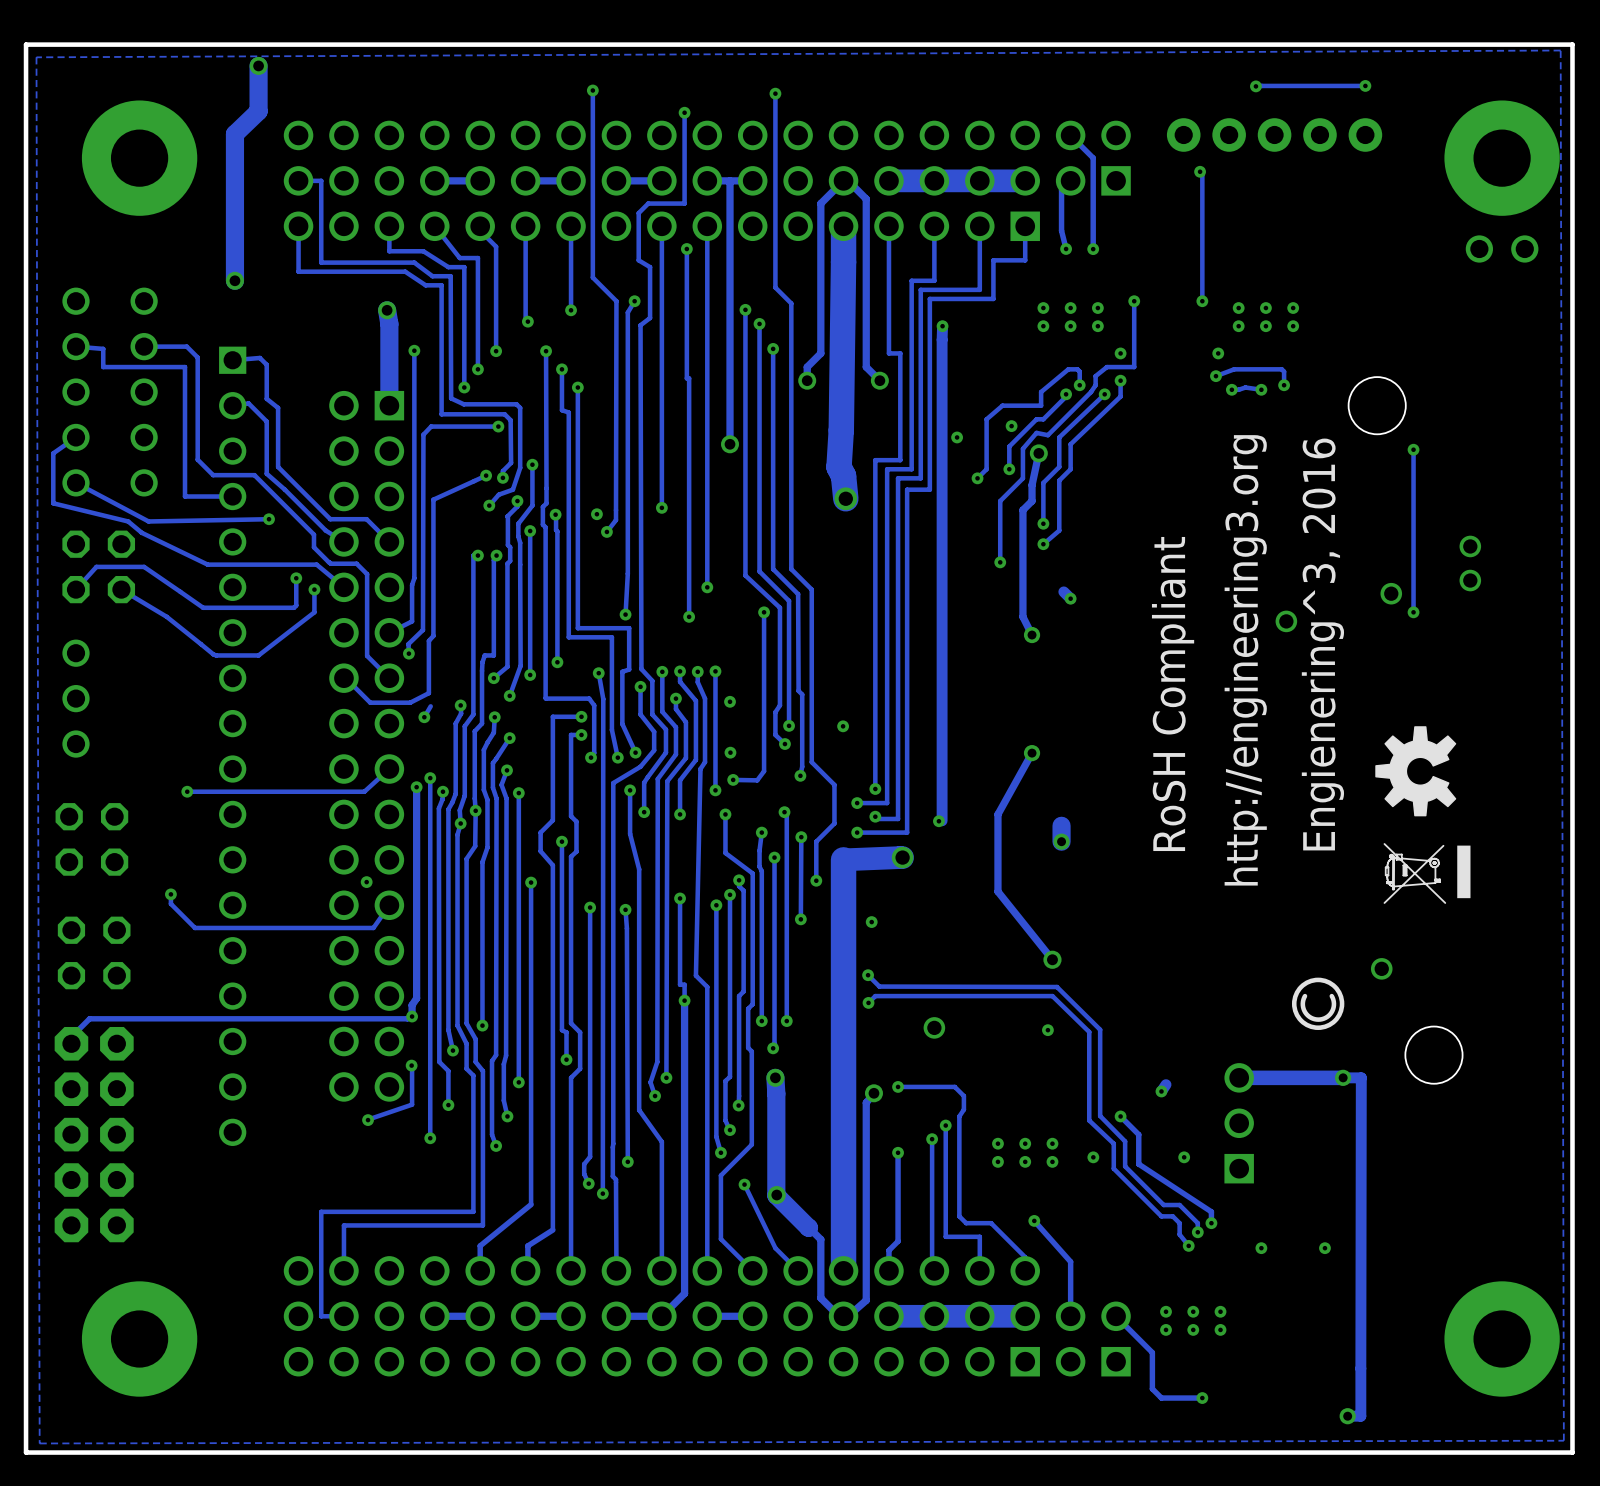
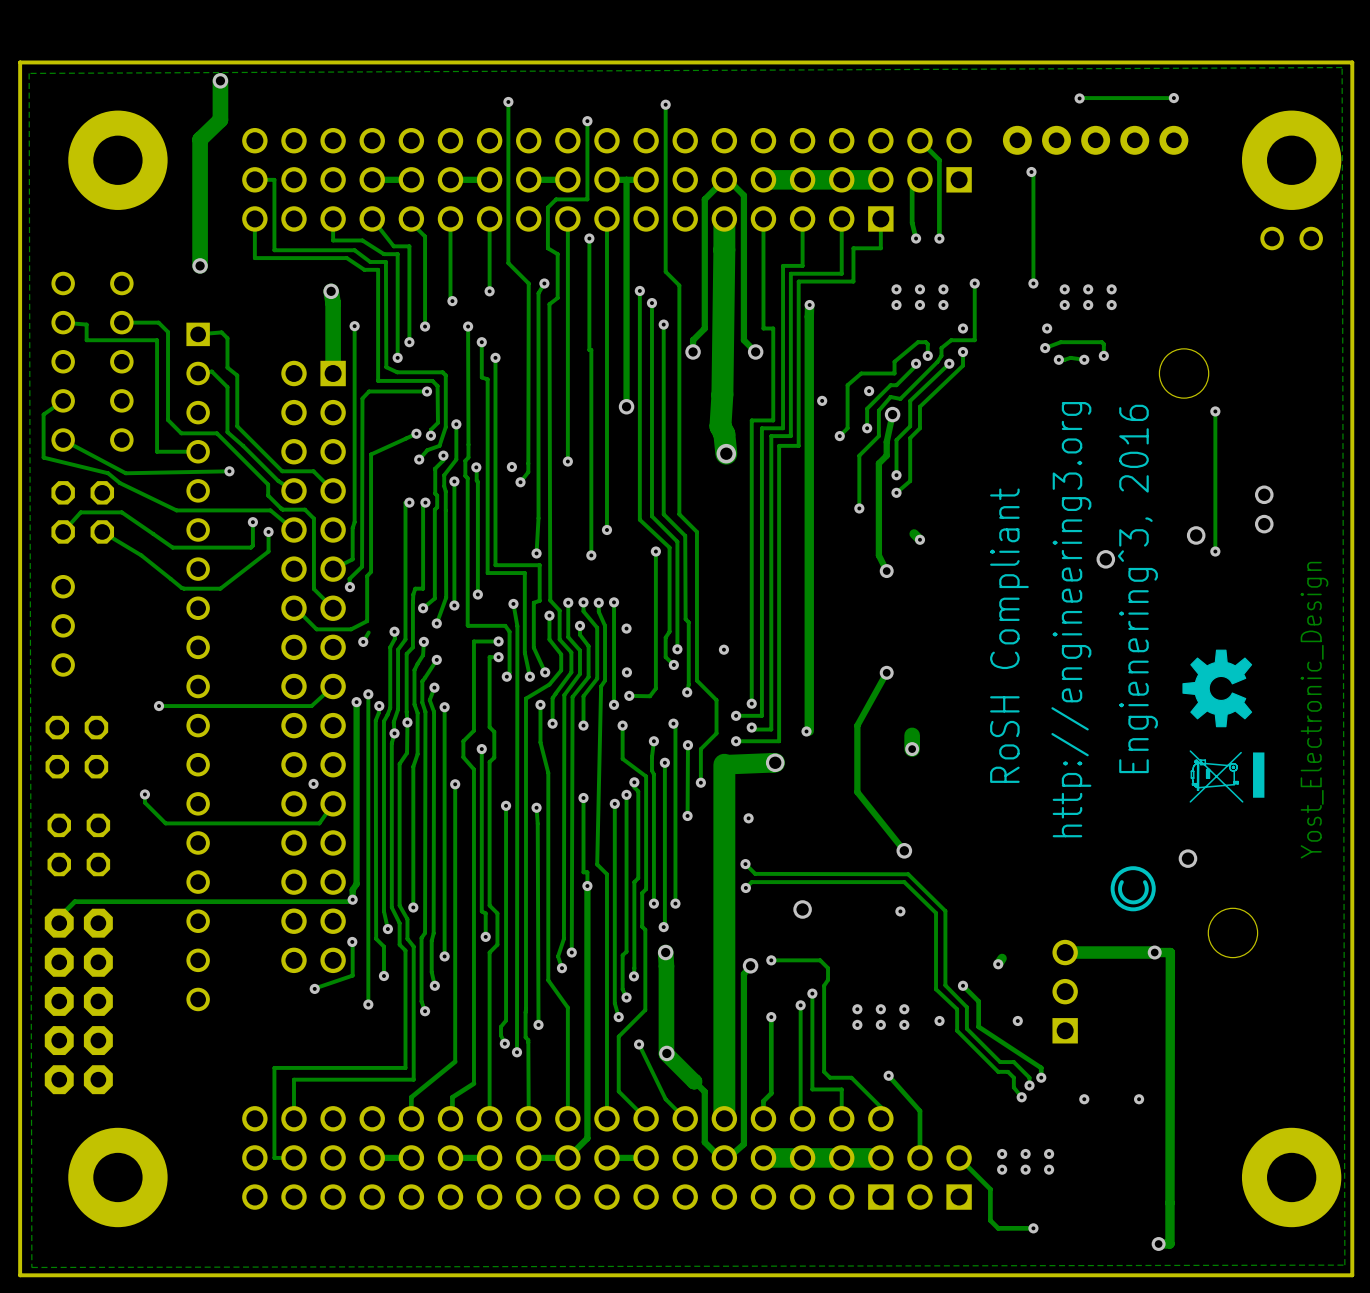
text: none -> Yost_Electronic_Design (1314, 710)

